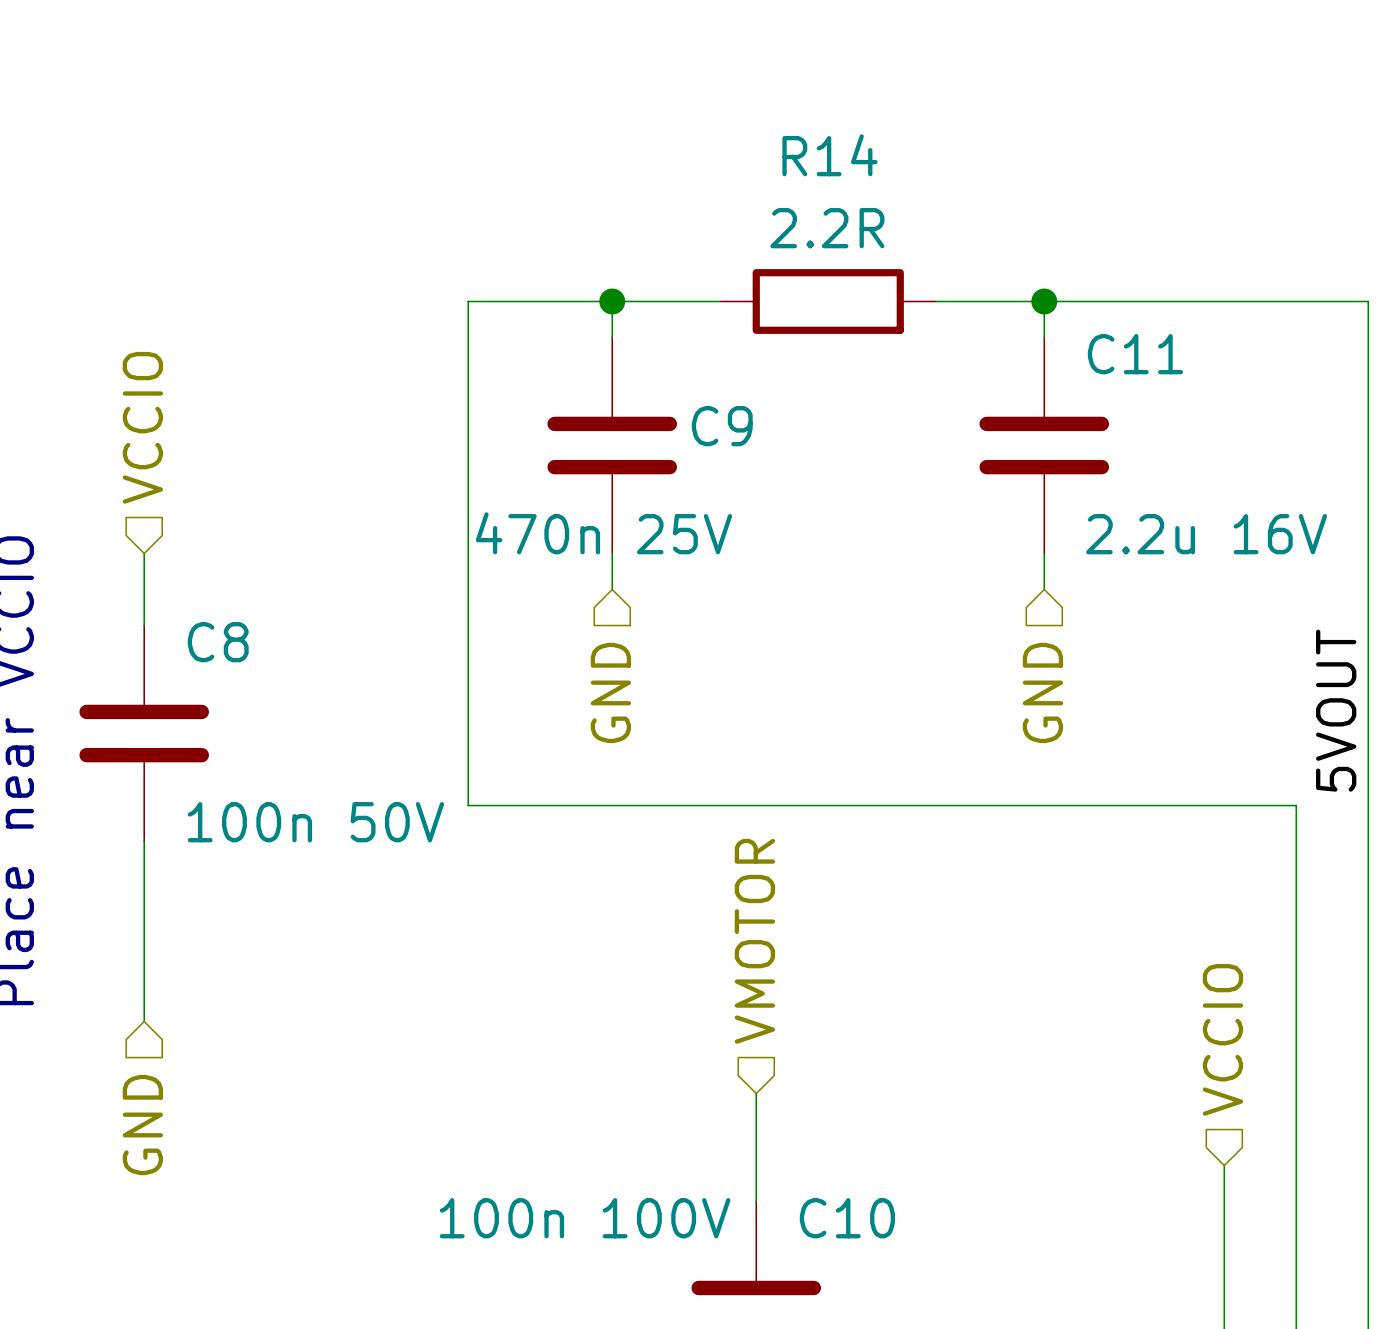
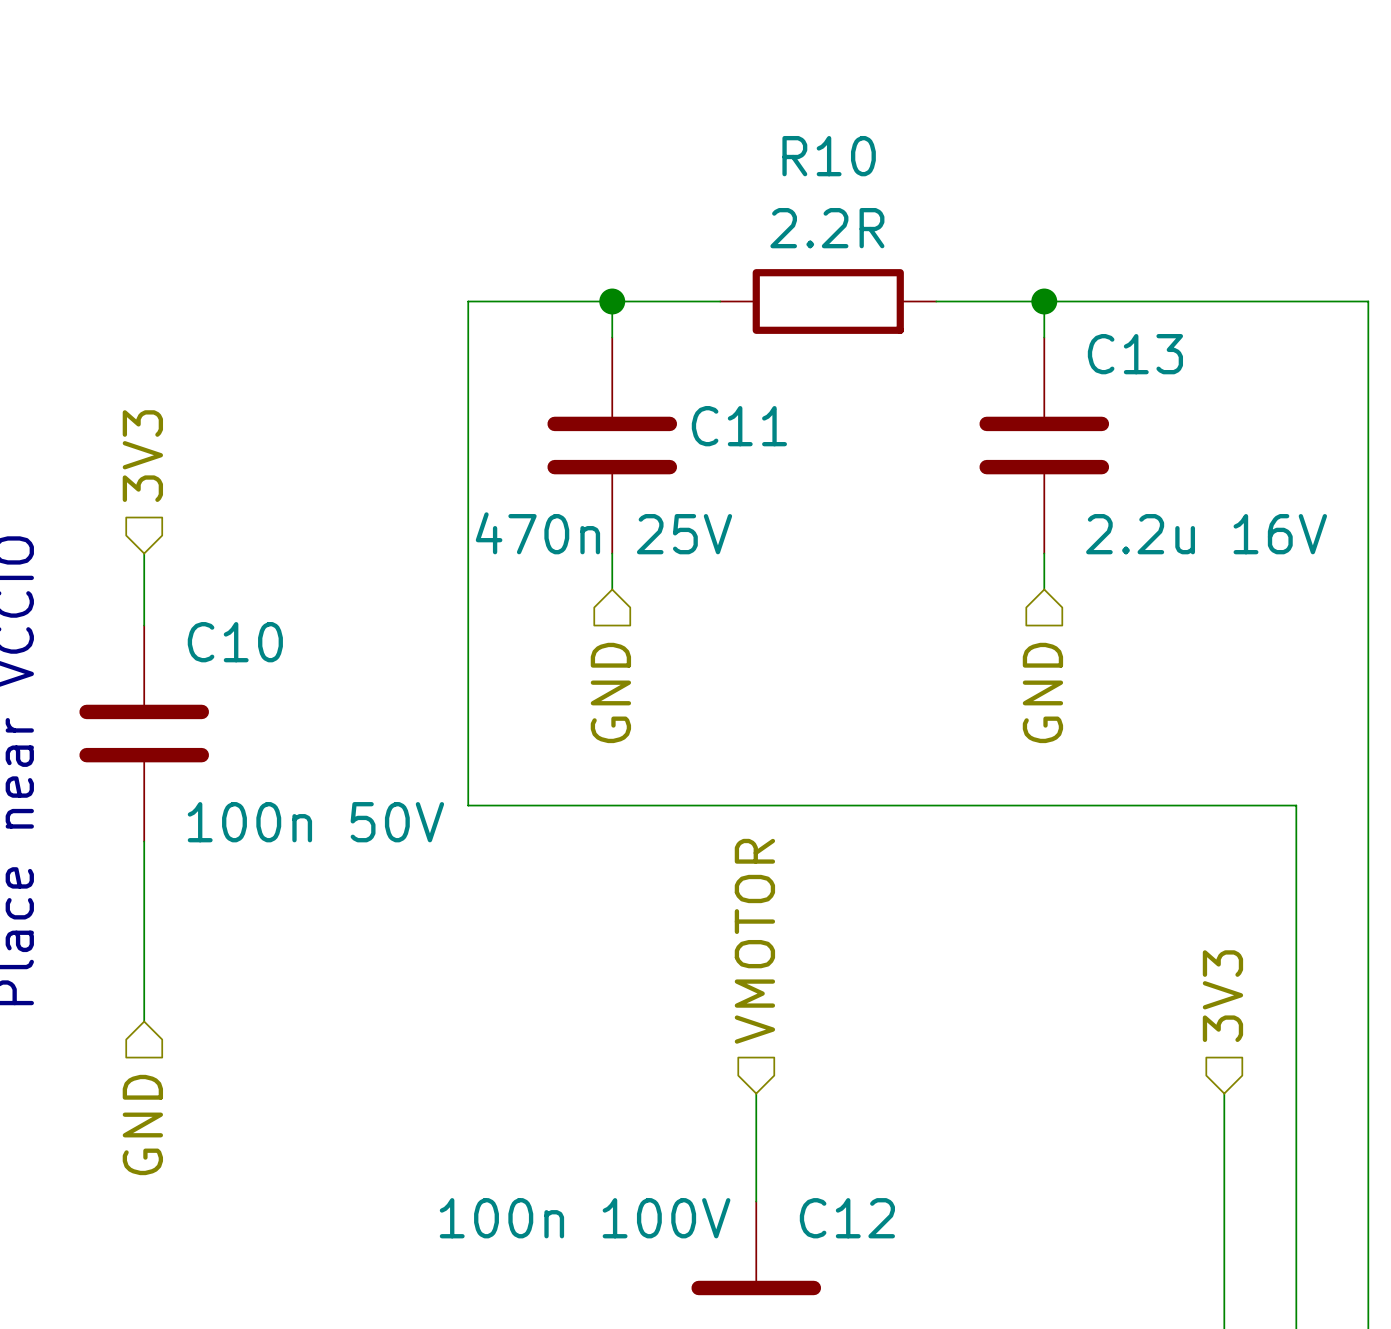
R14 name: R14 (829, 155) -> R10 (829, 156)
C11 name: C11 (1135, 354) -> C13 (1135, 354)
C9 name: C9 (722, 426) -> C11 (739, 426)
hierarchical label: VCCIO (142, 427) -> 3V3 (142, 456)
C8 name: C8 (218, 642) -> C10 (235, 642)
label: 5VOUT (1336, 710) -> none
hierarchical label: none -> 3V3 (1222, 996)
hierarchical label: VCCIO (1222, 1039) -> none
wire: none -> (1224, 1093) (1224, 1165)
C10 name: C10 (847, 1218) -> C12 (847, 1218)

